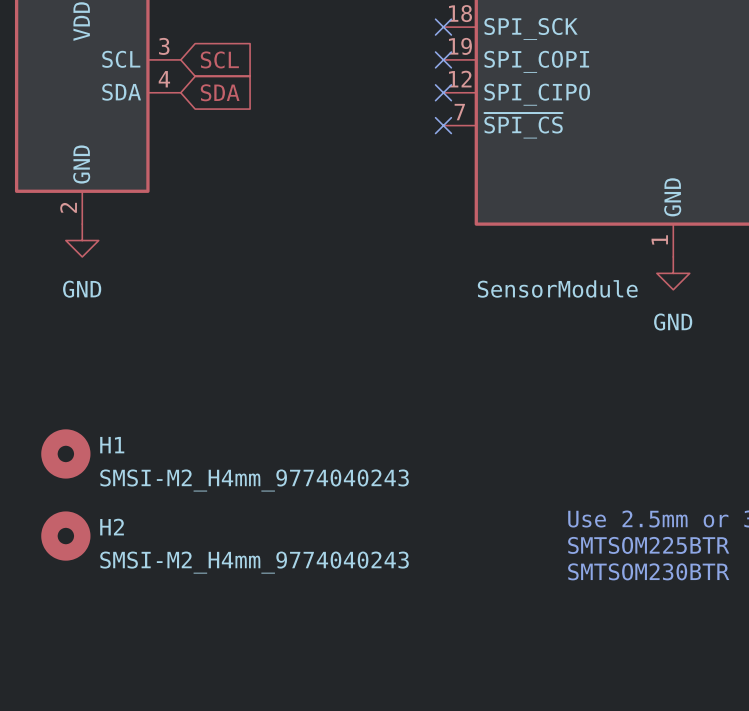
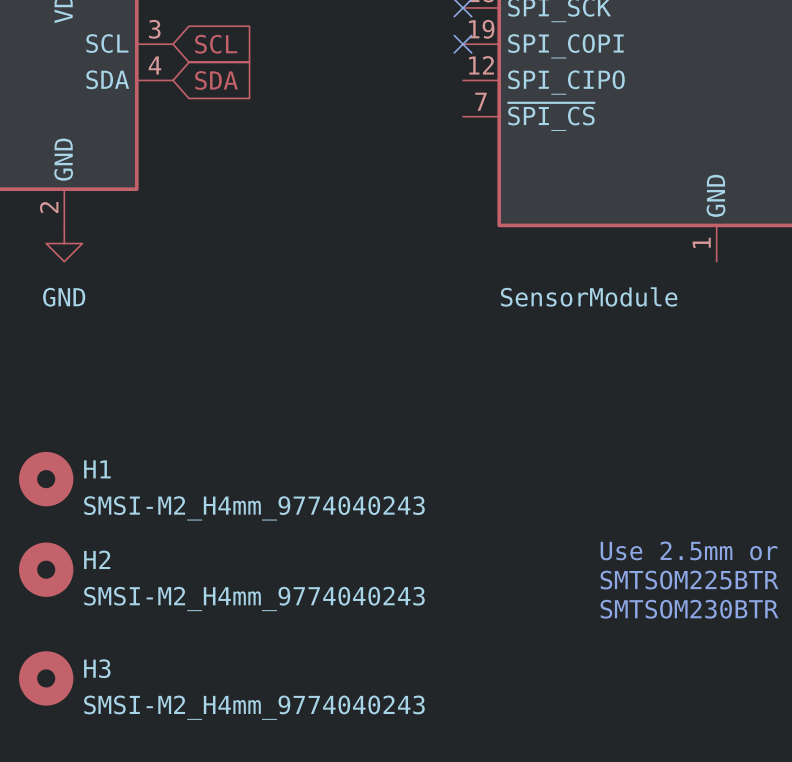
no-connect mark: (443, 92) -> none
no-connect mark: (443, 125) -> none
power symbol: GND (673, 273) -> none
H3: none -> SMSI-M2_H4mm_9774040243 (46, 678)

